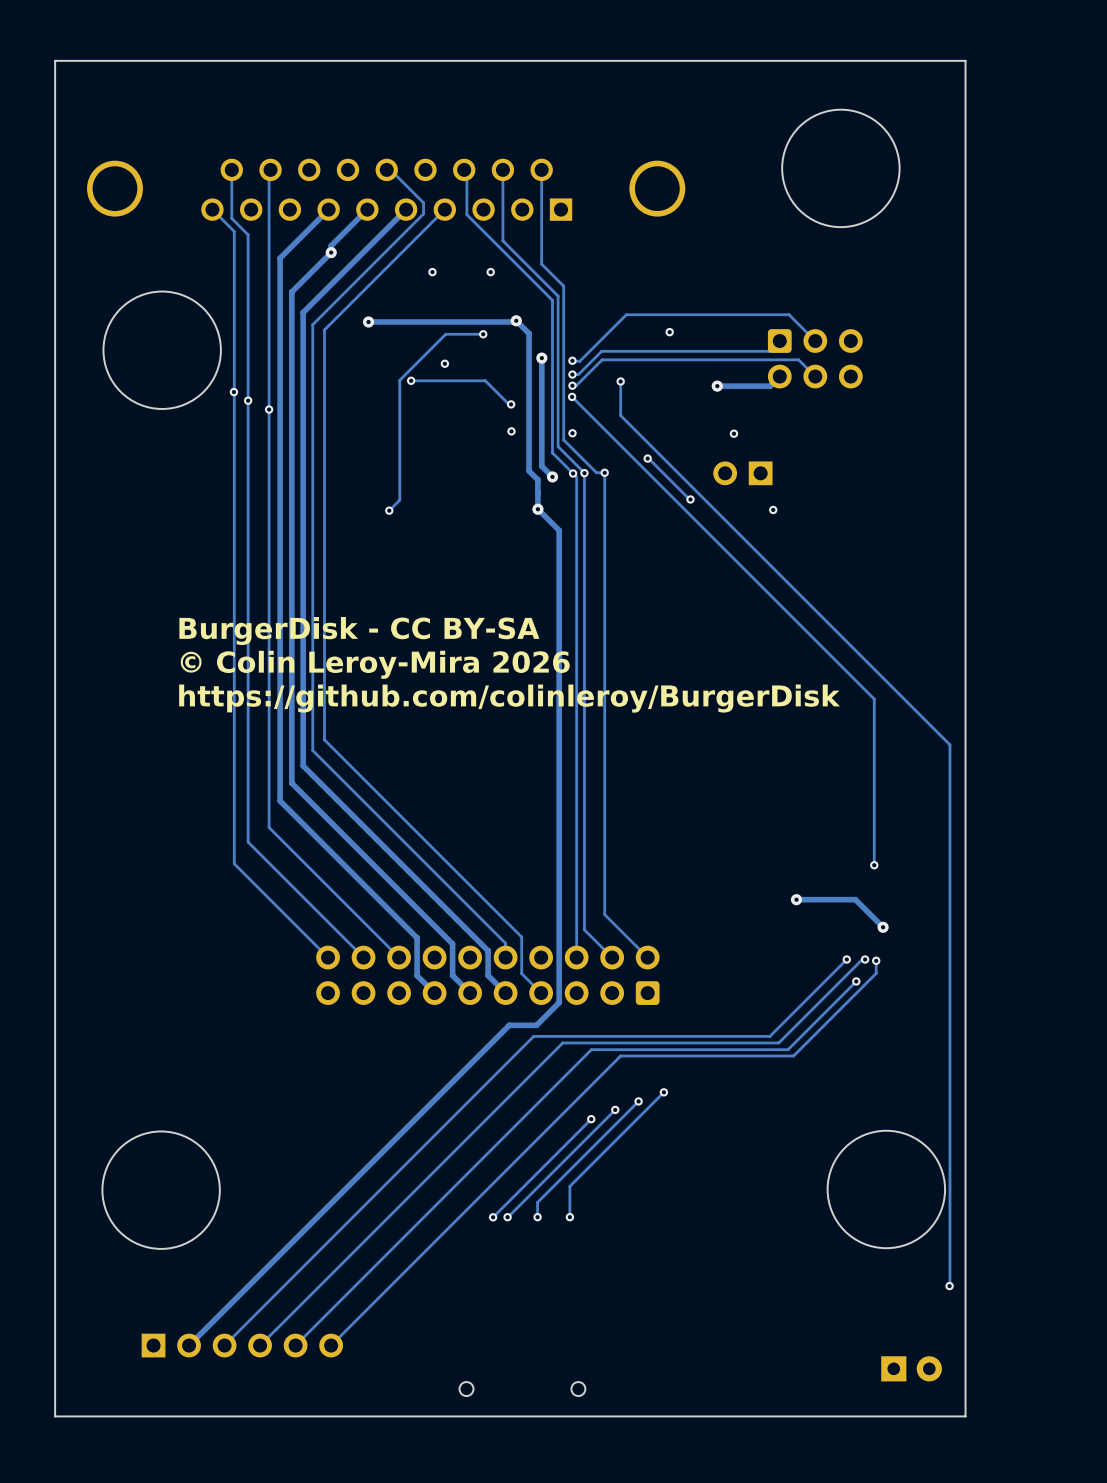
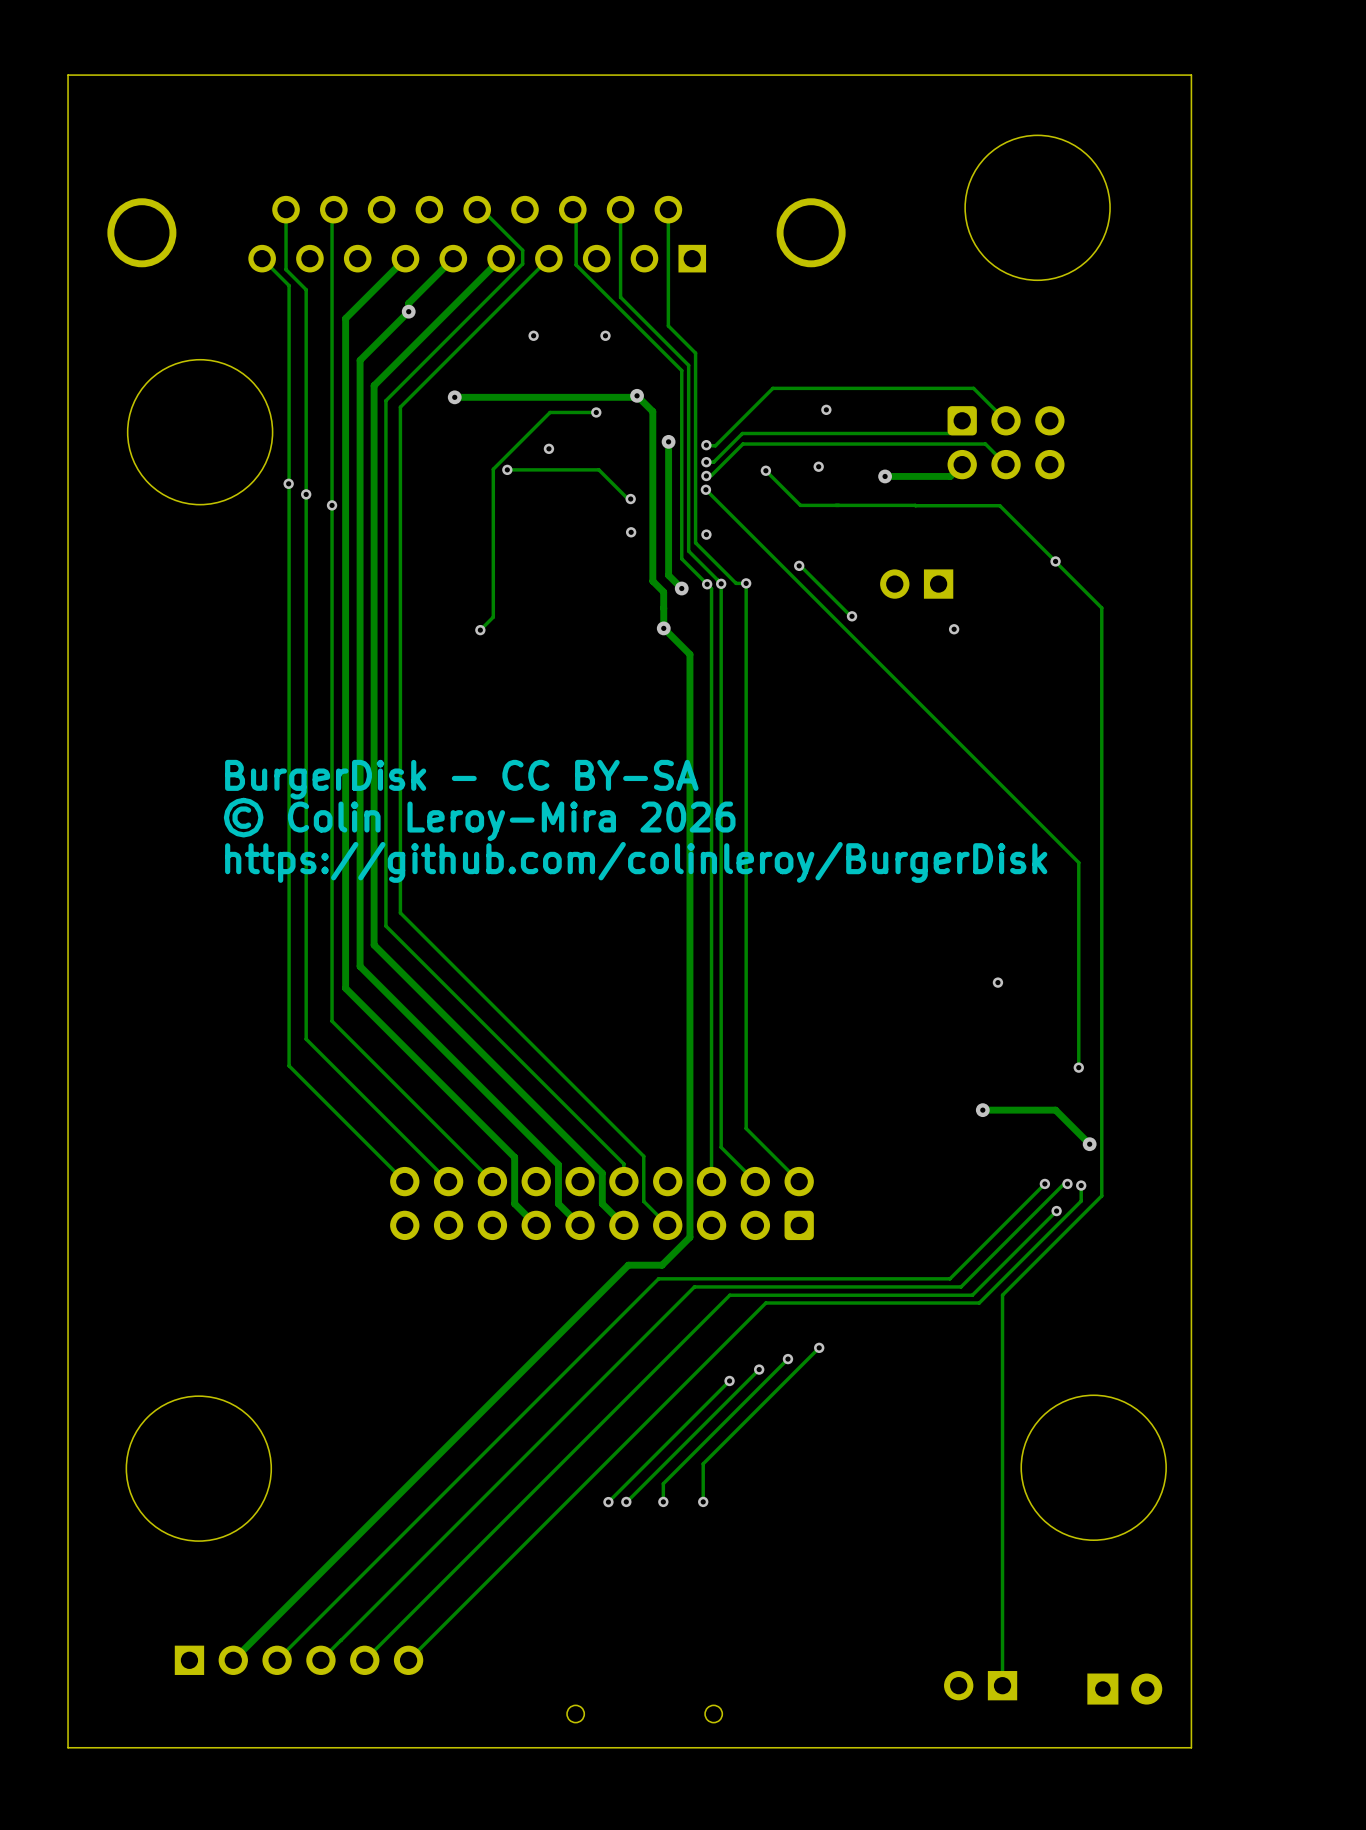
via: none -> (818, 466)
track: (620, 381) (620, 415) (949, 744) (949, 1286) -> (765, 470) (800, 505) (999, 505) (1055, 561)
via: (733, 433) -> none
track: none -> (1055, 561) (1101, 607) (1101, 1195) (1002, 1295) (1002, 1685)
via: none -> (1055, 561)
via: none -> (997, 982)
via: (949, 1286) -> none
part: none -> (980, 1685)

